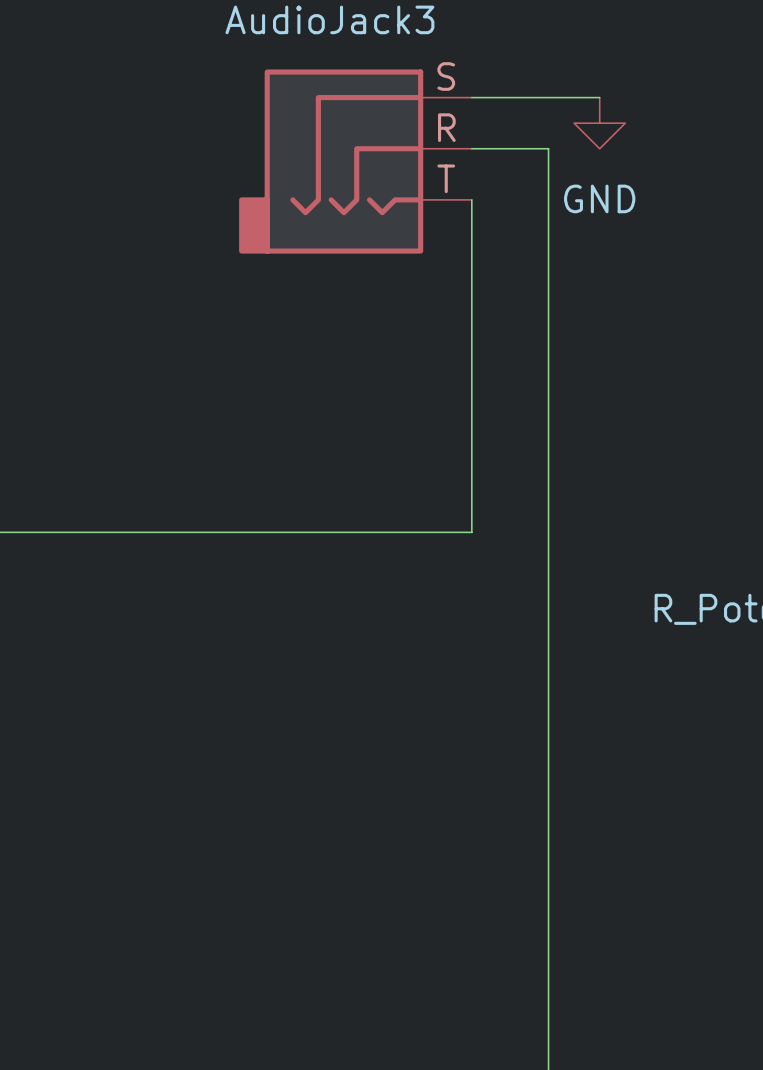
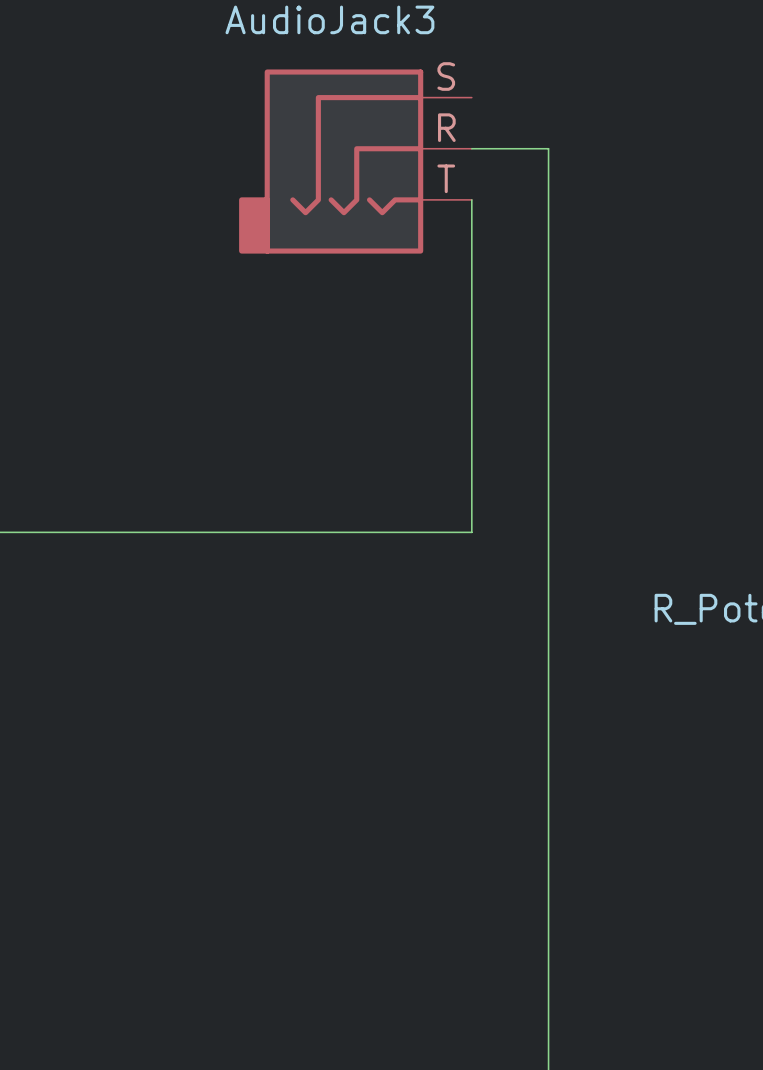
wire: (471, 97) (599, 97) -> none
power symbol: GND (599, 123) -> none

